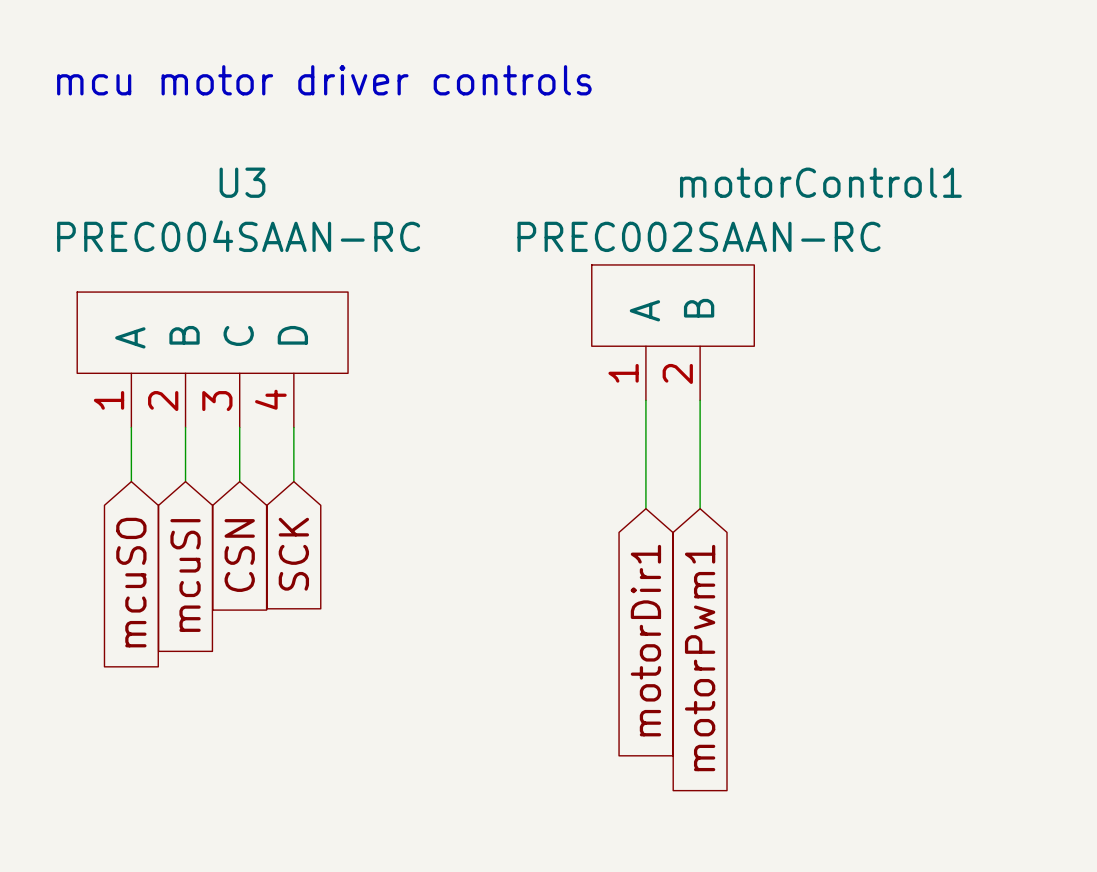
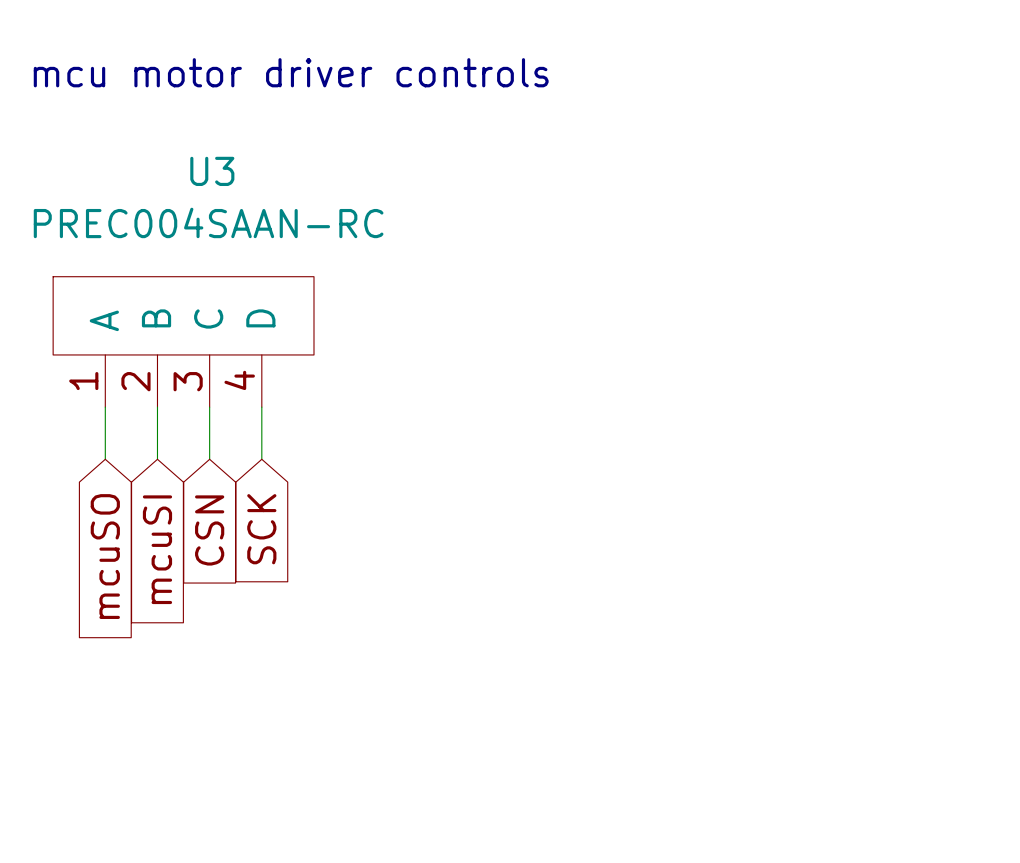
motorControl1: PREC002SAAN-RC (673, 332) -> none
wire: (645, 400) (645, 508) -> none
wire: (700, 400) (700, 508) -> none
global label: motorDir1 (645, 640) -> none
global label: motorPwm1 (700, 658) -> none

